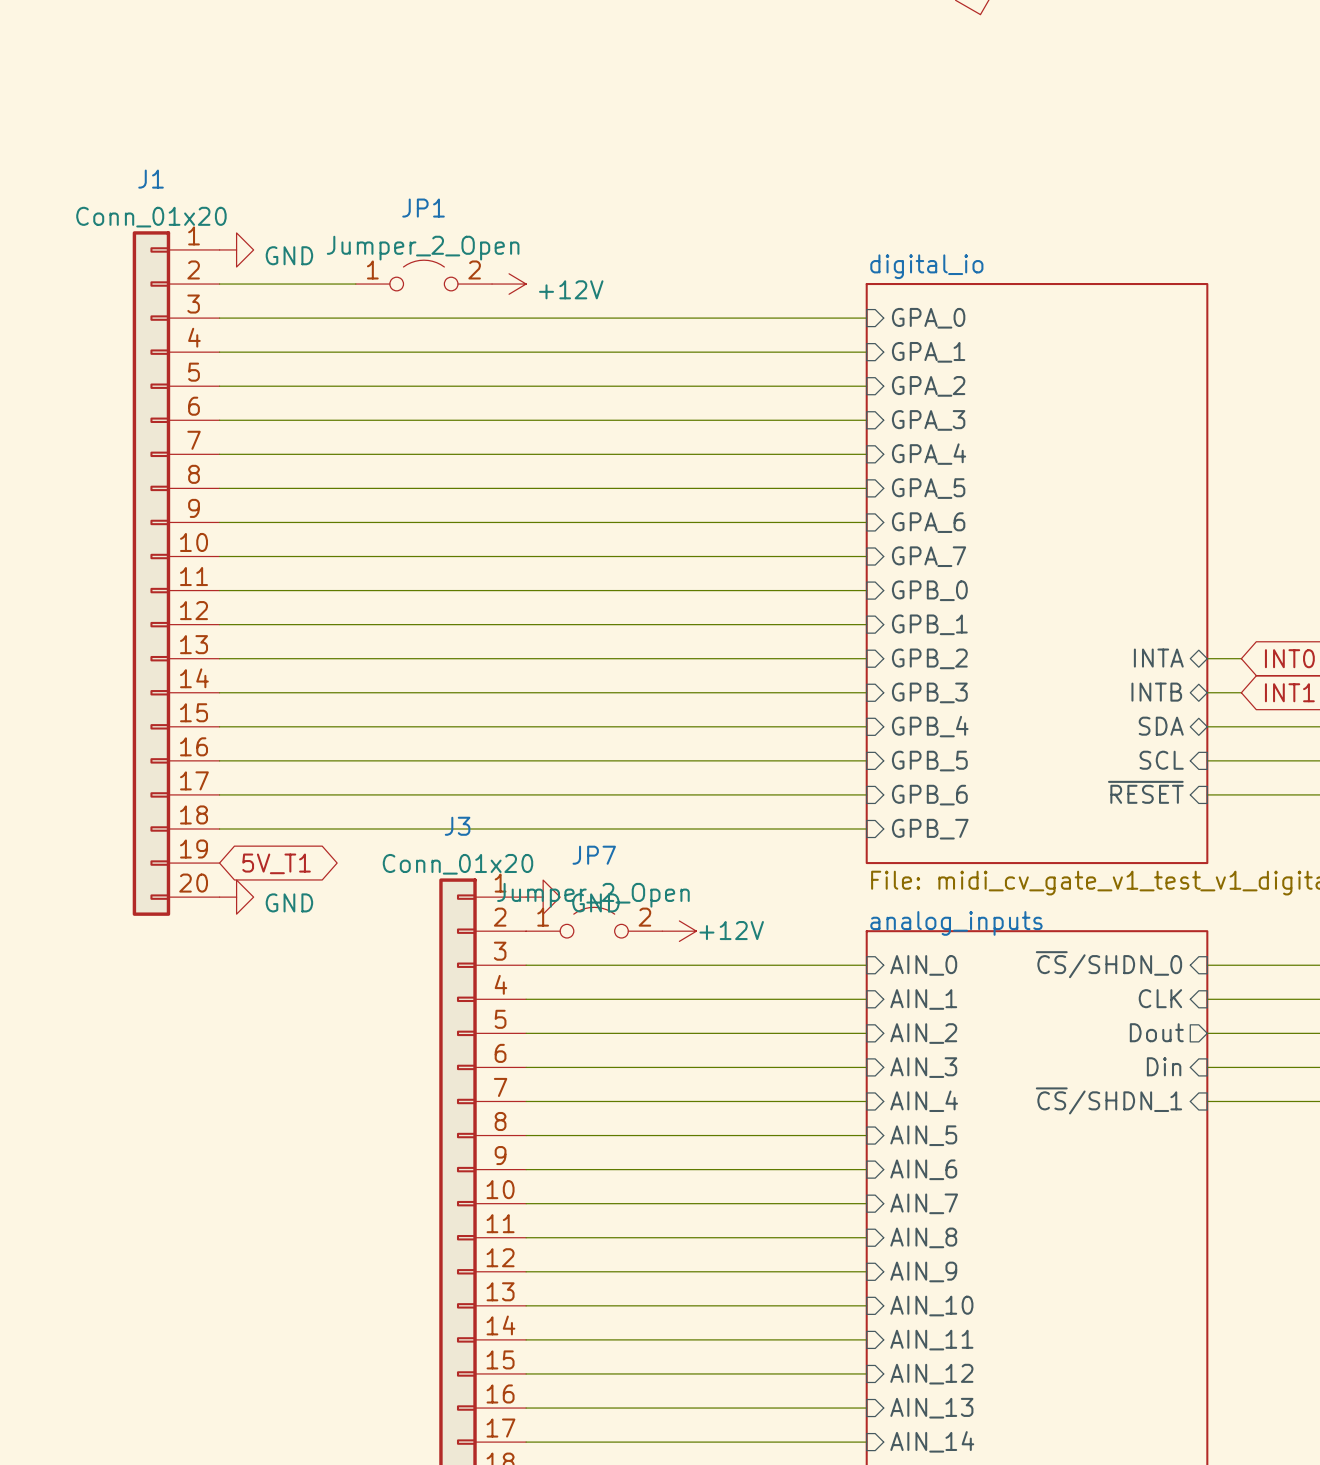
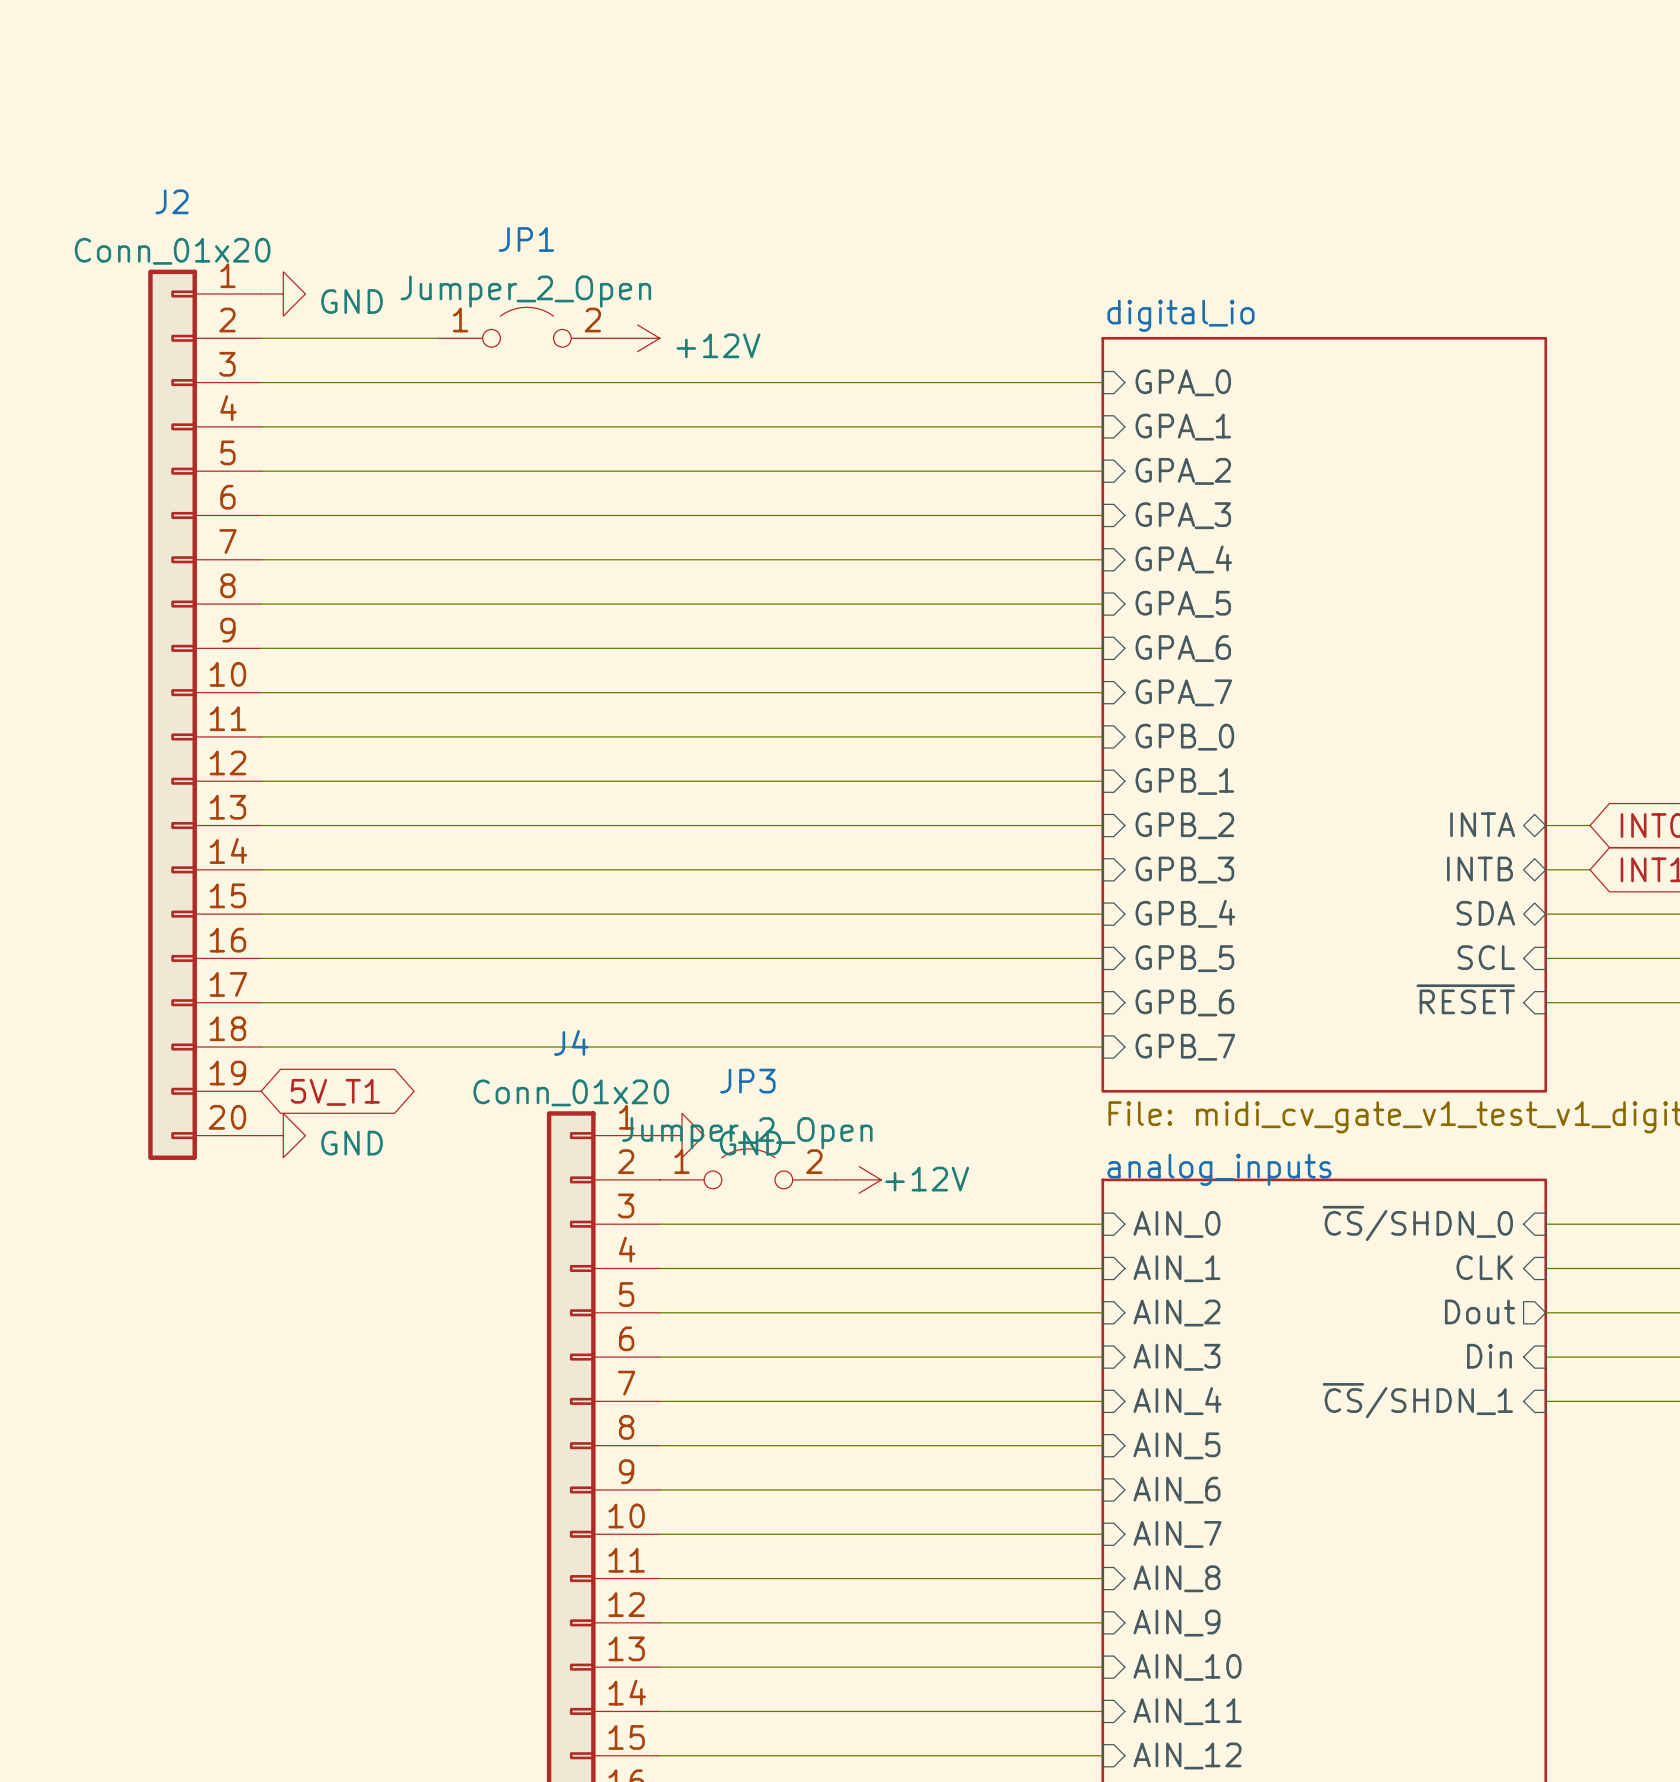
J1 name: J1 (151, 179) -> J2 (172, 201)
J3 name: J3 (457, 826) -> J4 (571, 1042)
JP7 name: JP7 (594, 855) -> JP3 (747, 1081)

